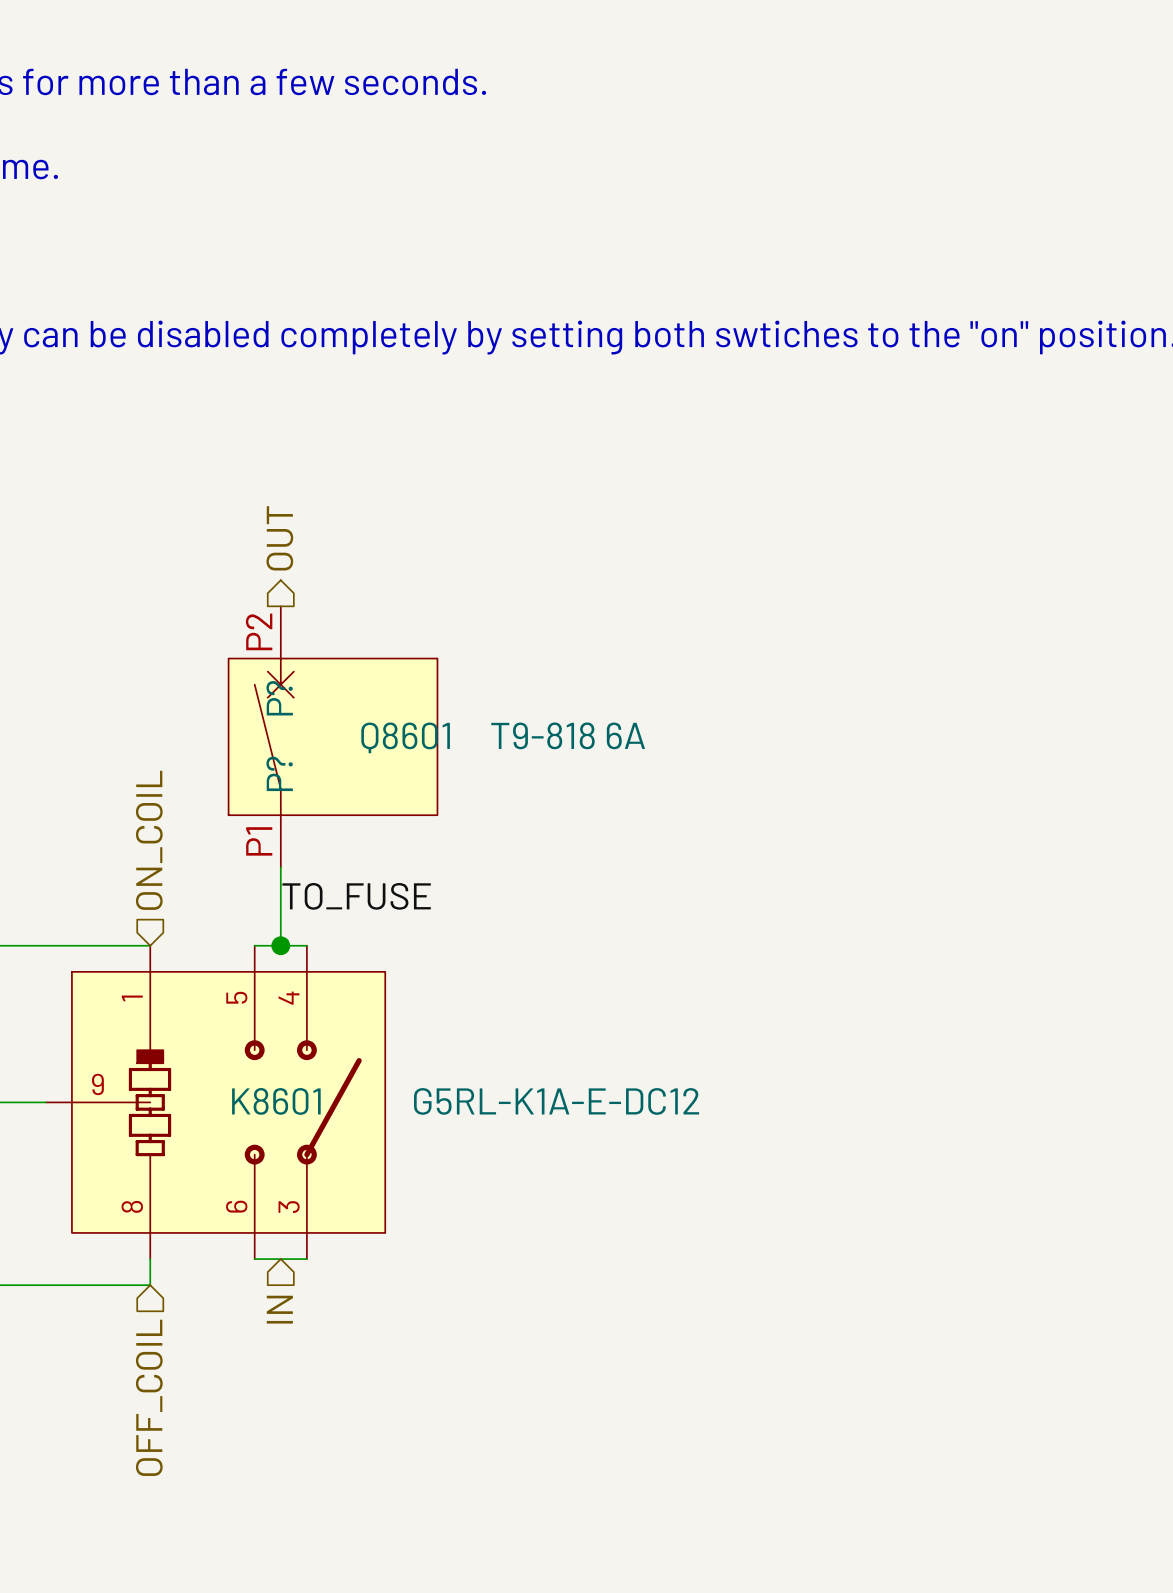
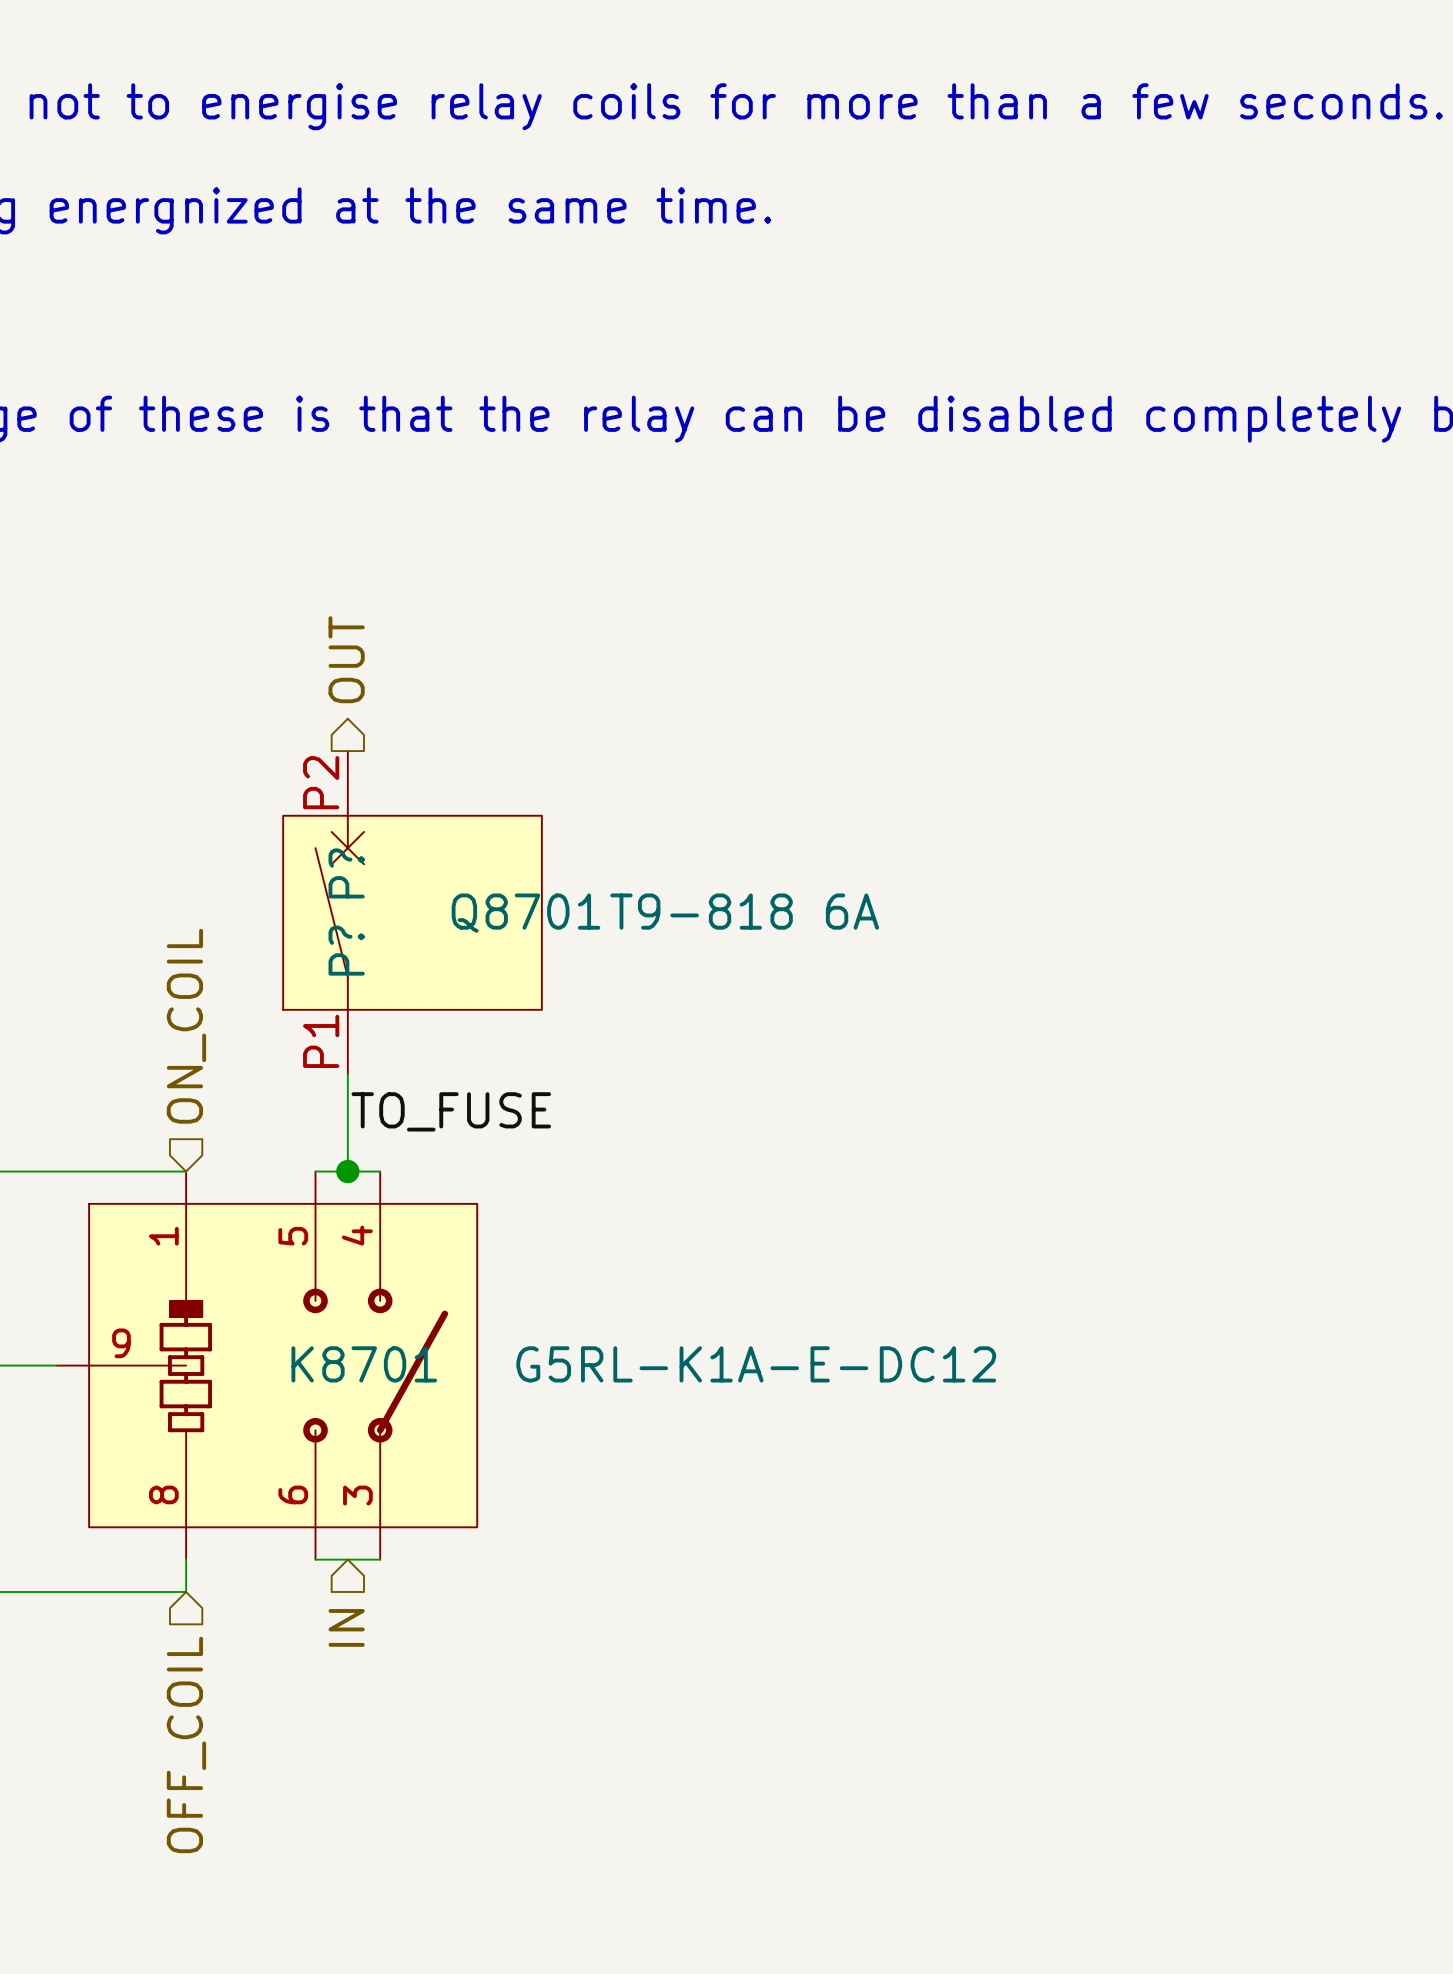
Q8601 name: Q8601 (405, 737) -> Q8701 (525, 913)
K8601 name: K8601 (276, 1101) -> K8701 (364, 1364)

